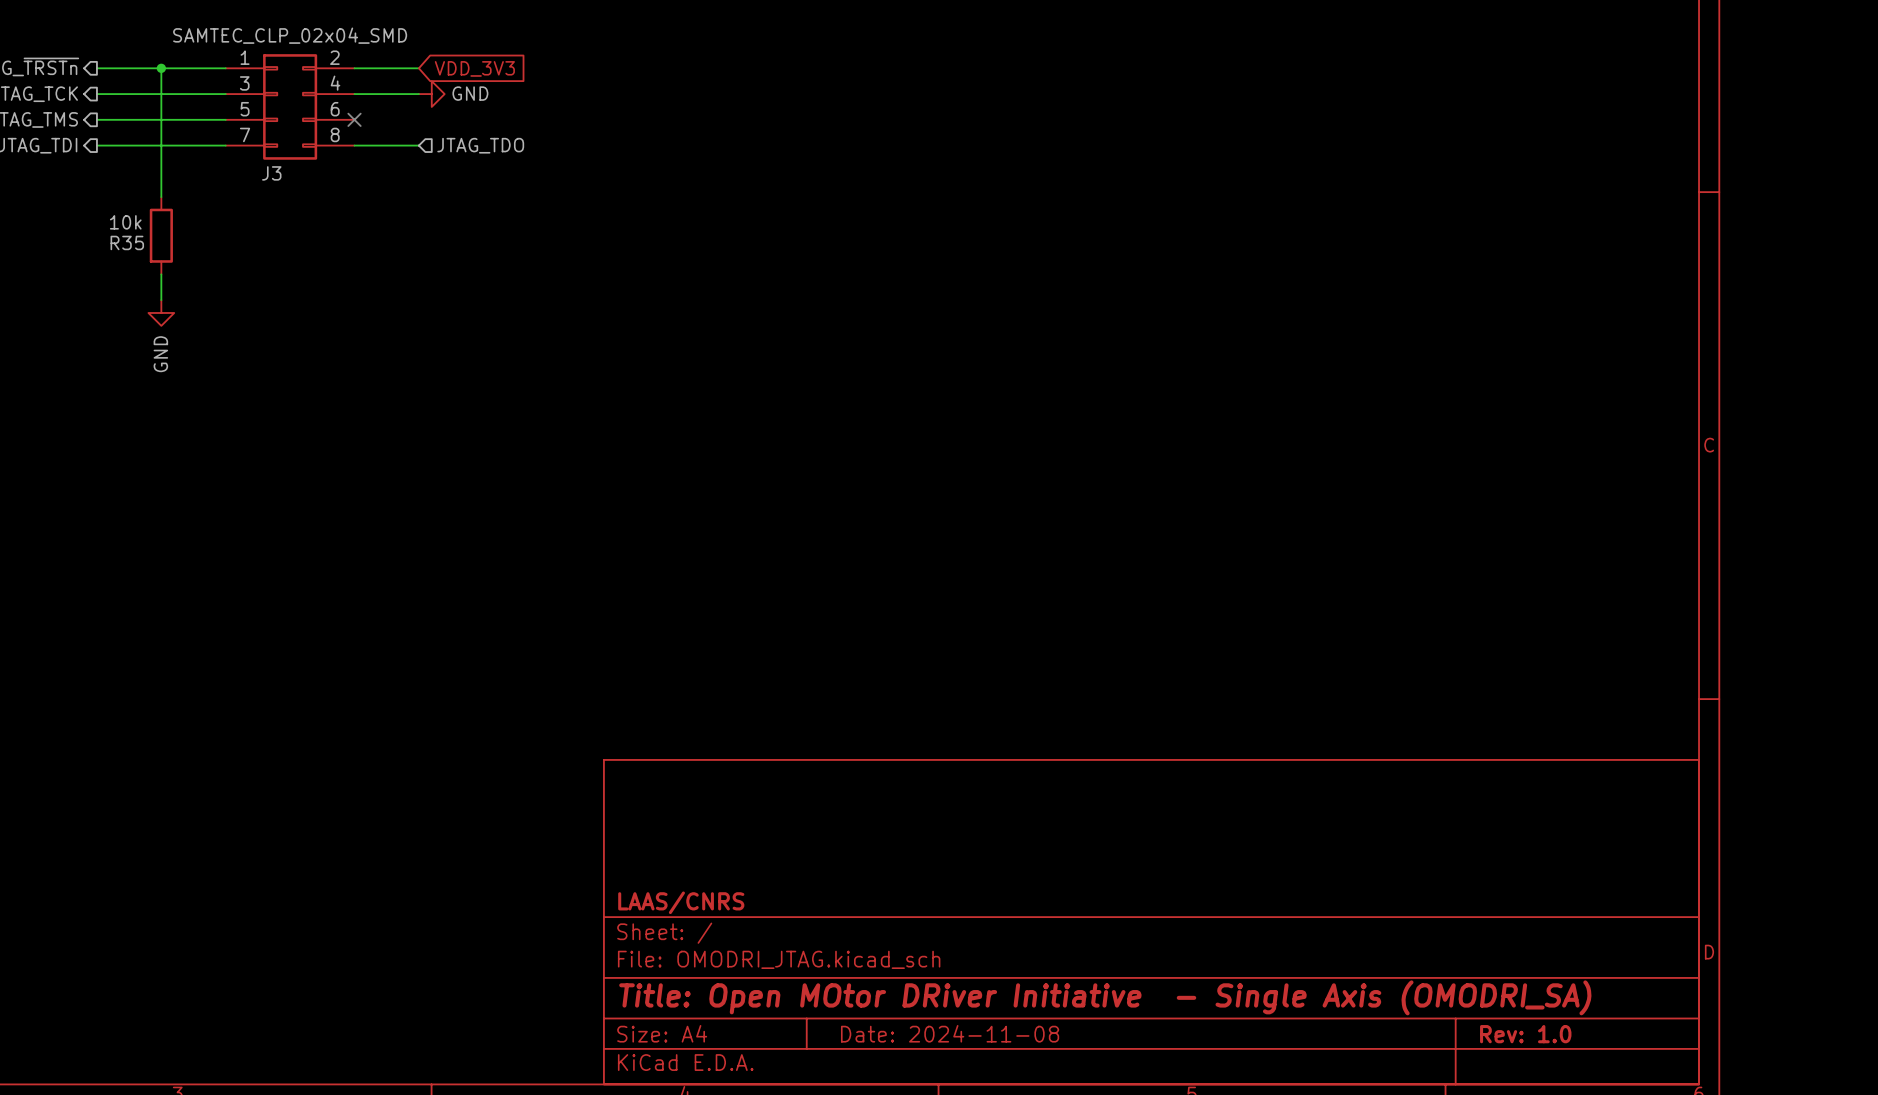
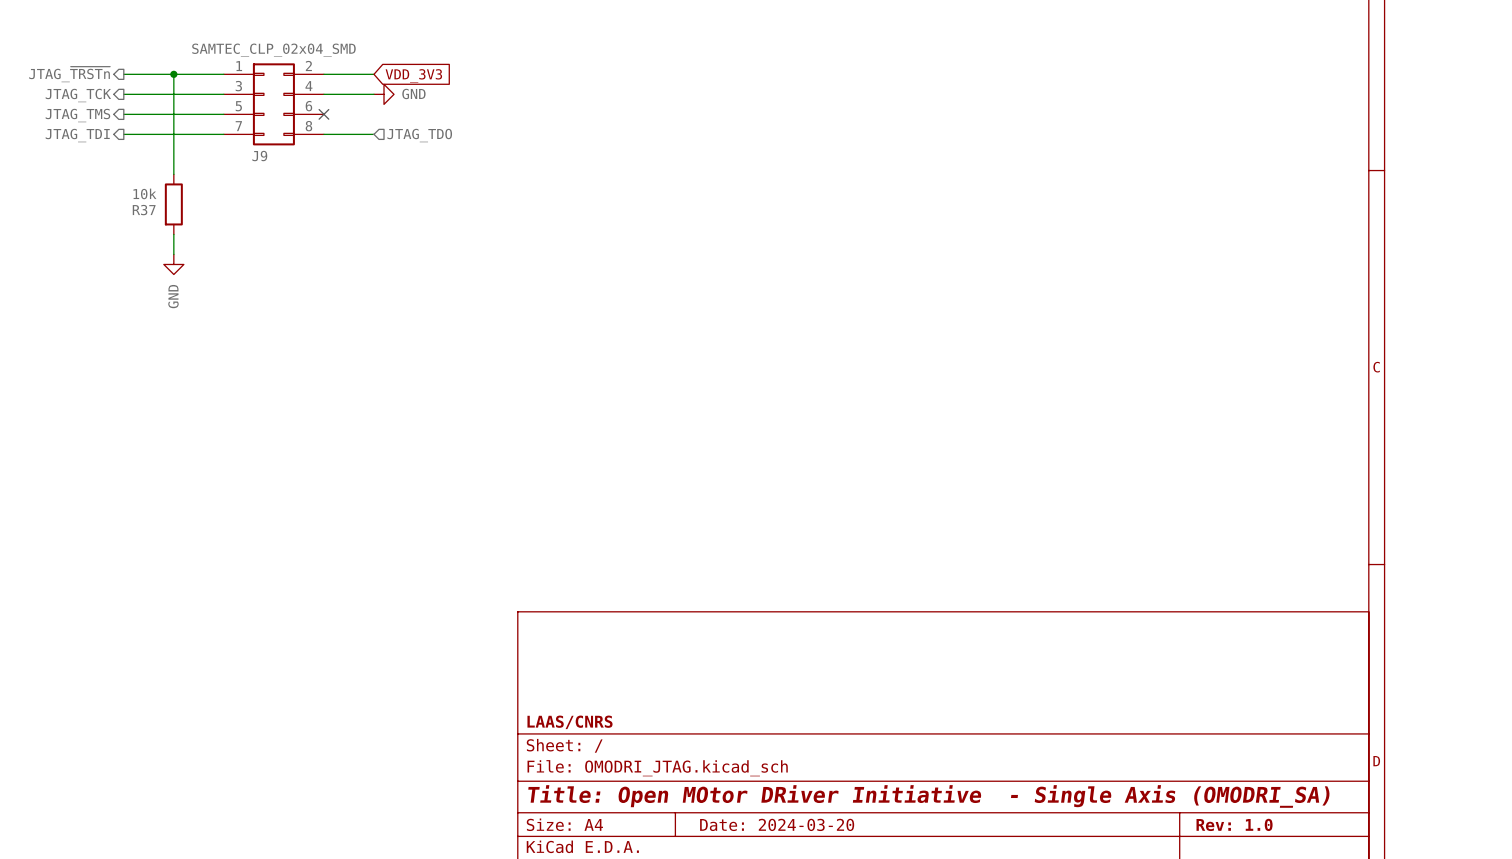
J3 name: J3 (271, 173) -> J9 (259, 156)
R35 name: R35 (127, 242) -> R37 (144, 210)
title block: Date: 2024-11-08 (950, 1033) -> Date: 2024-03-20 (777, 824)

